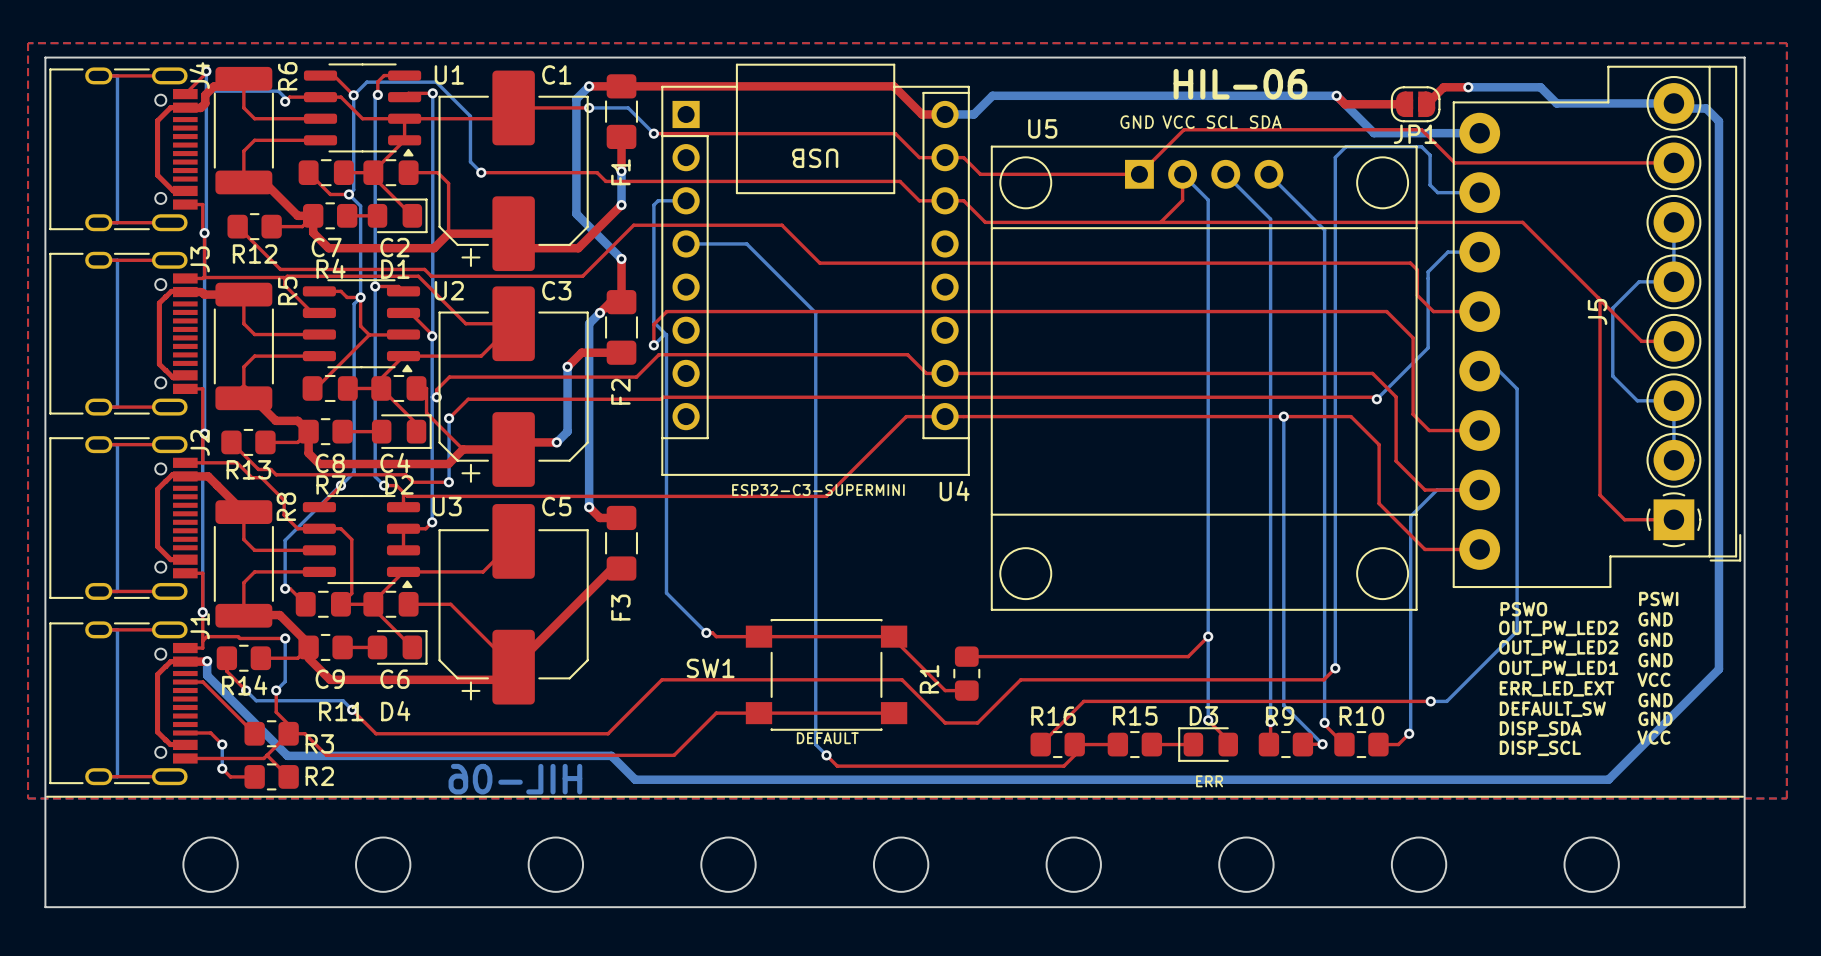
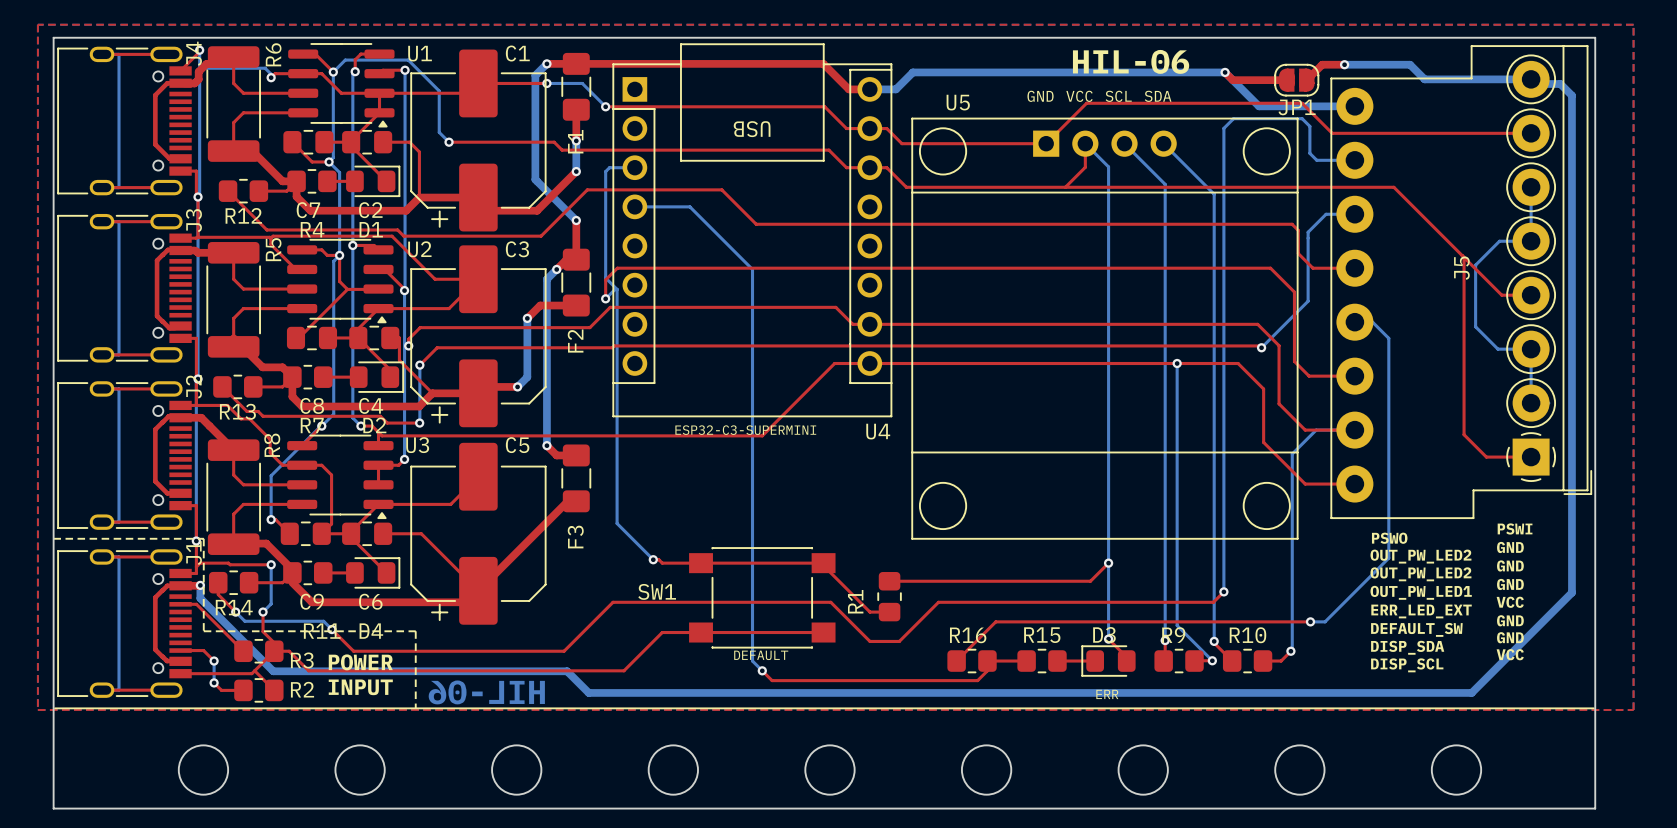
line: none -> (53, 538) (203, 538) (203, 631) (415, 631) (415, 708)
text: none -> POWER (360, 662)
text: none -> INPUT (360, 687)

